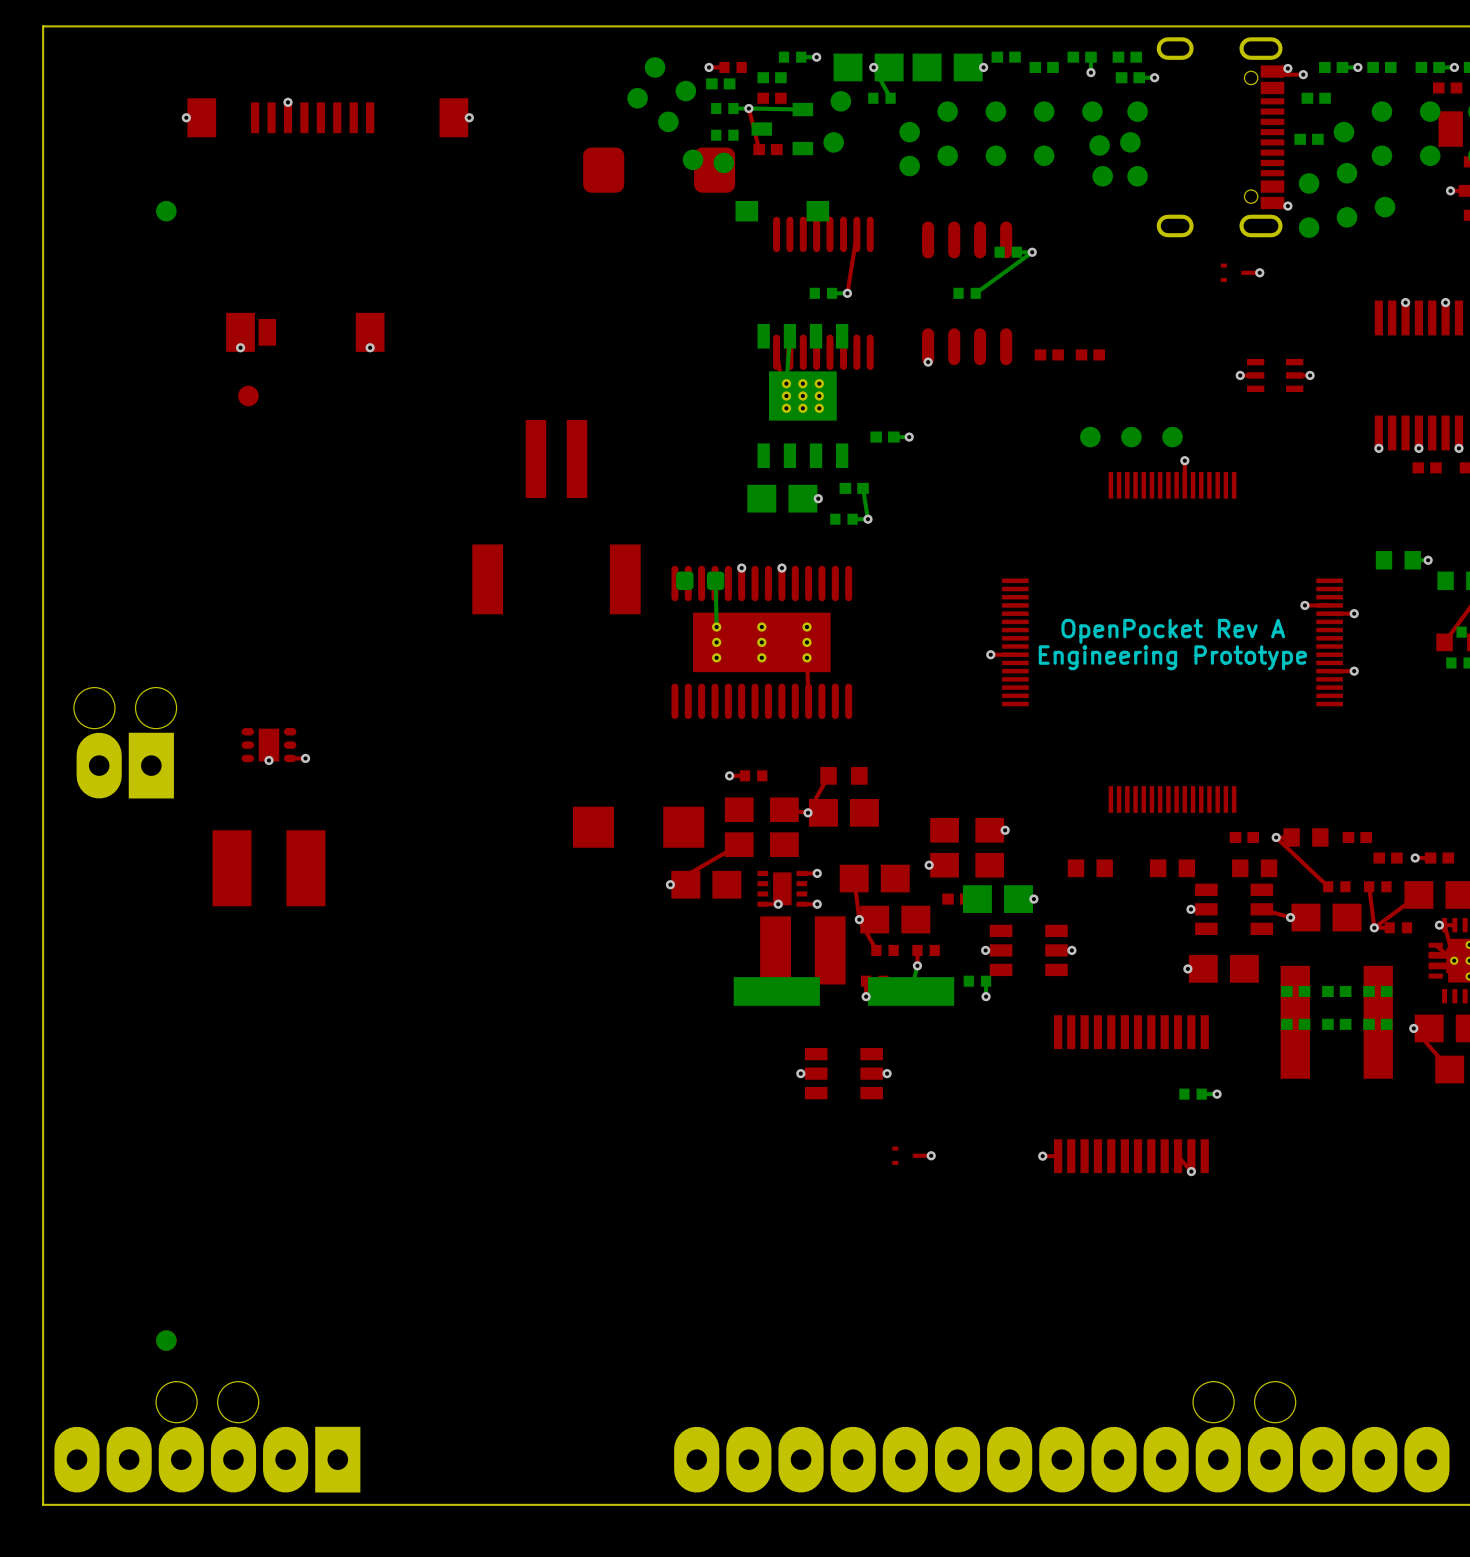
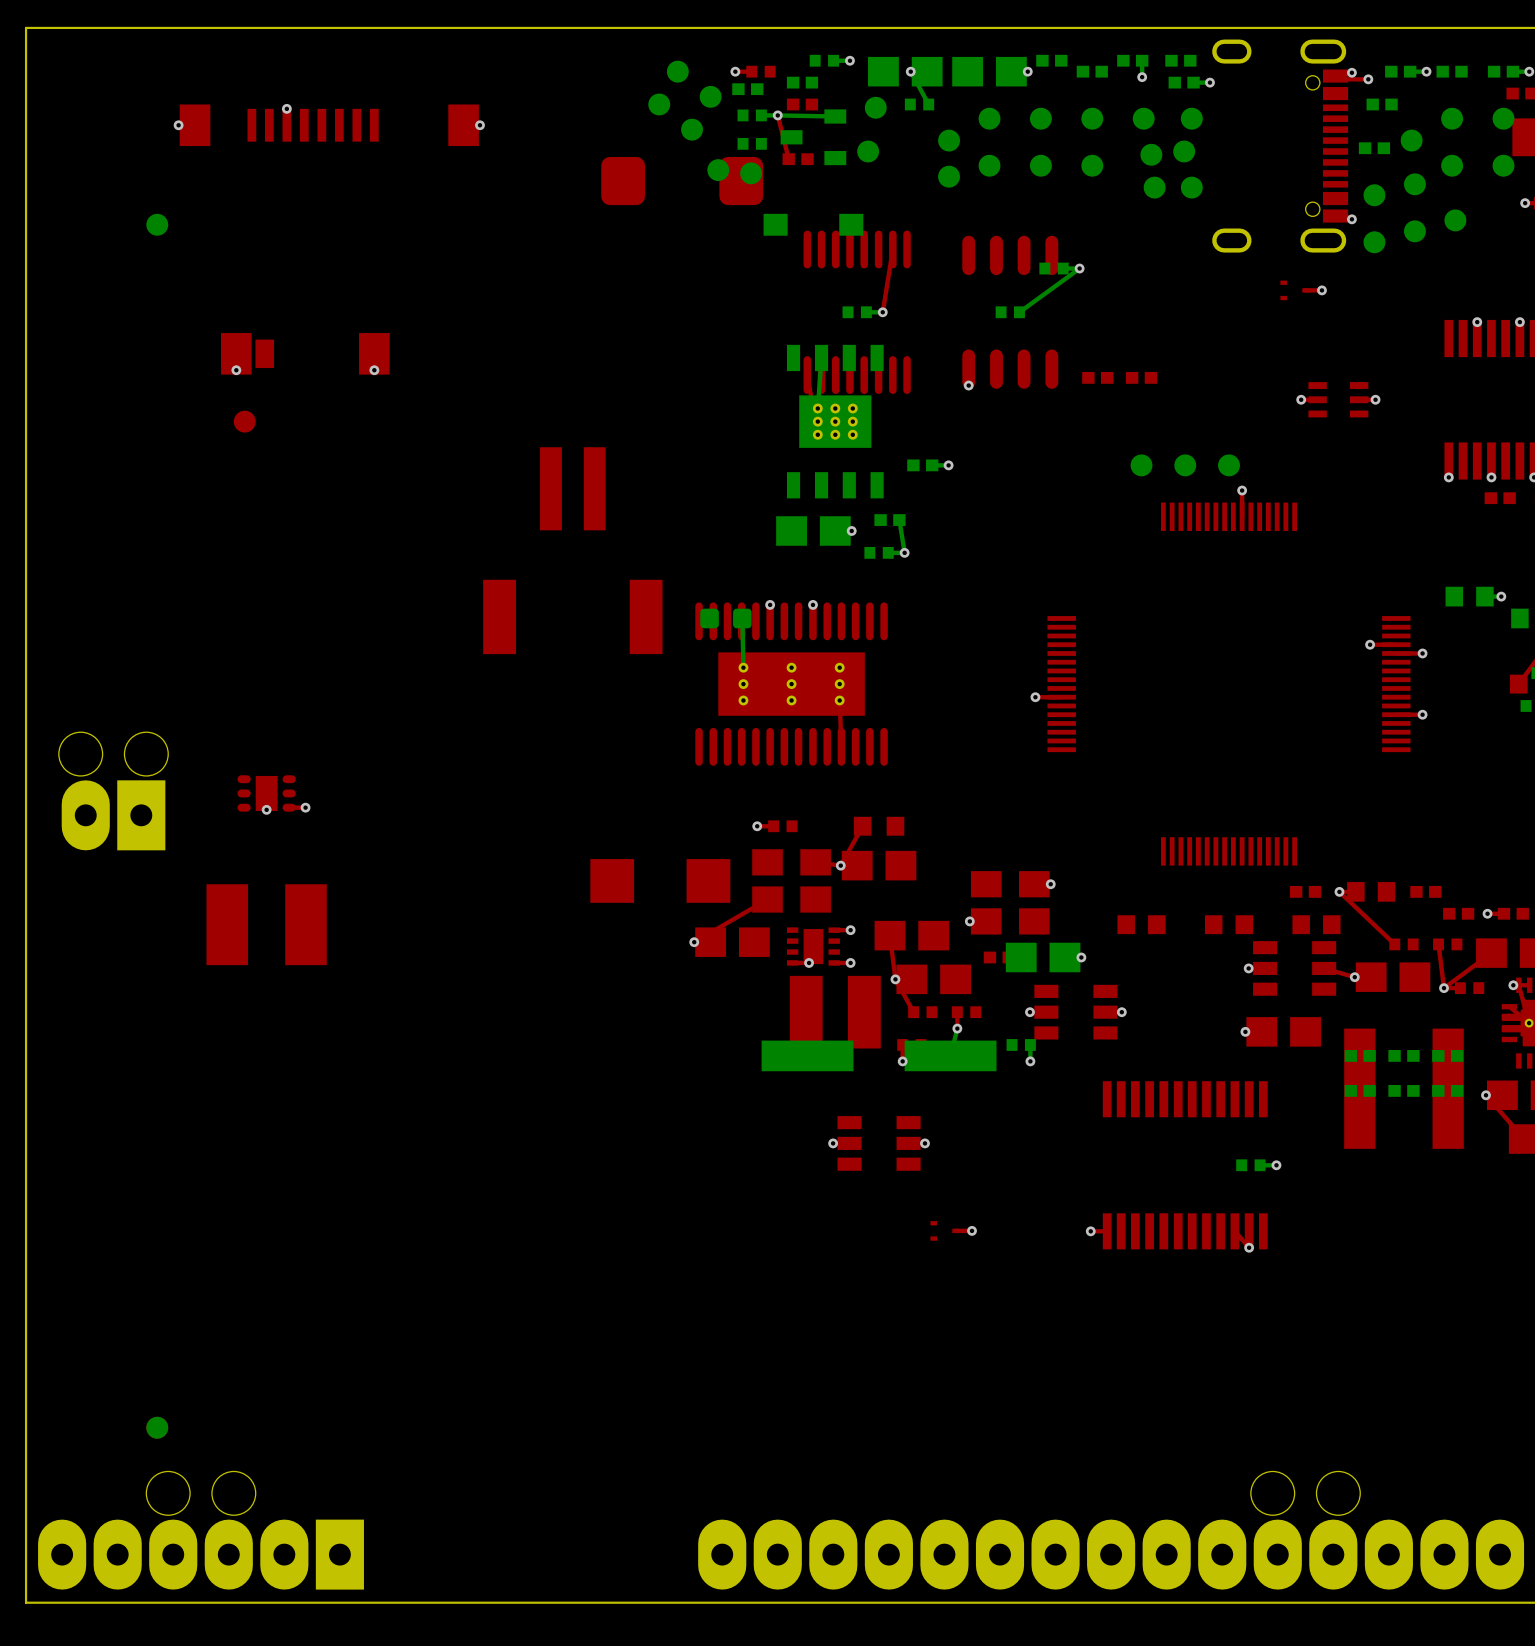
text: OpenPocket Rev A (1173, 631) -> none
text: Engineering Prototype (1172, 657) -> none

